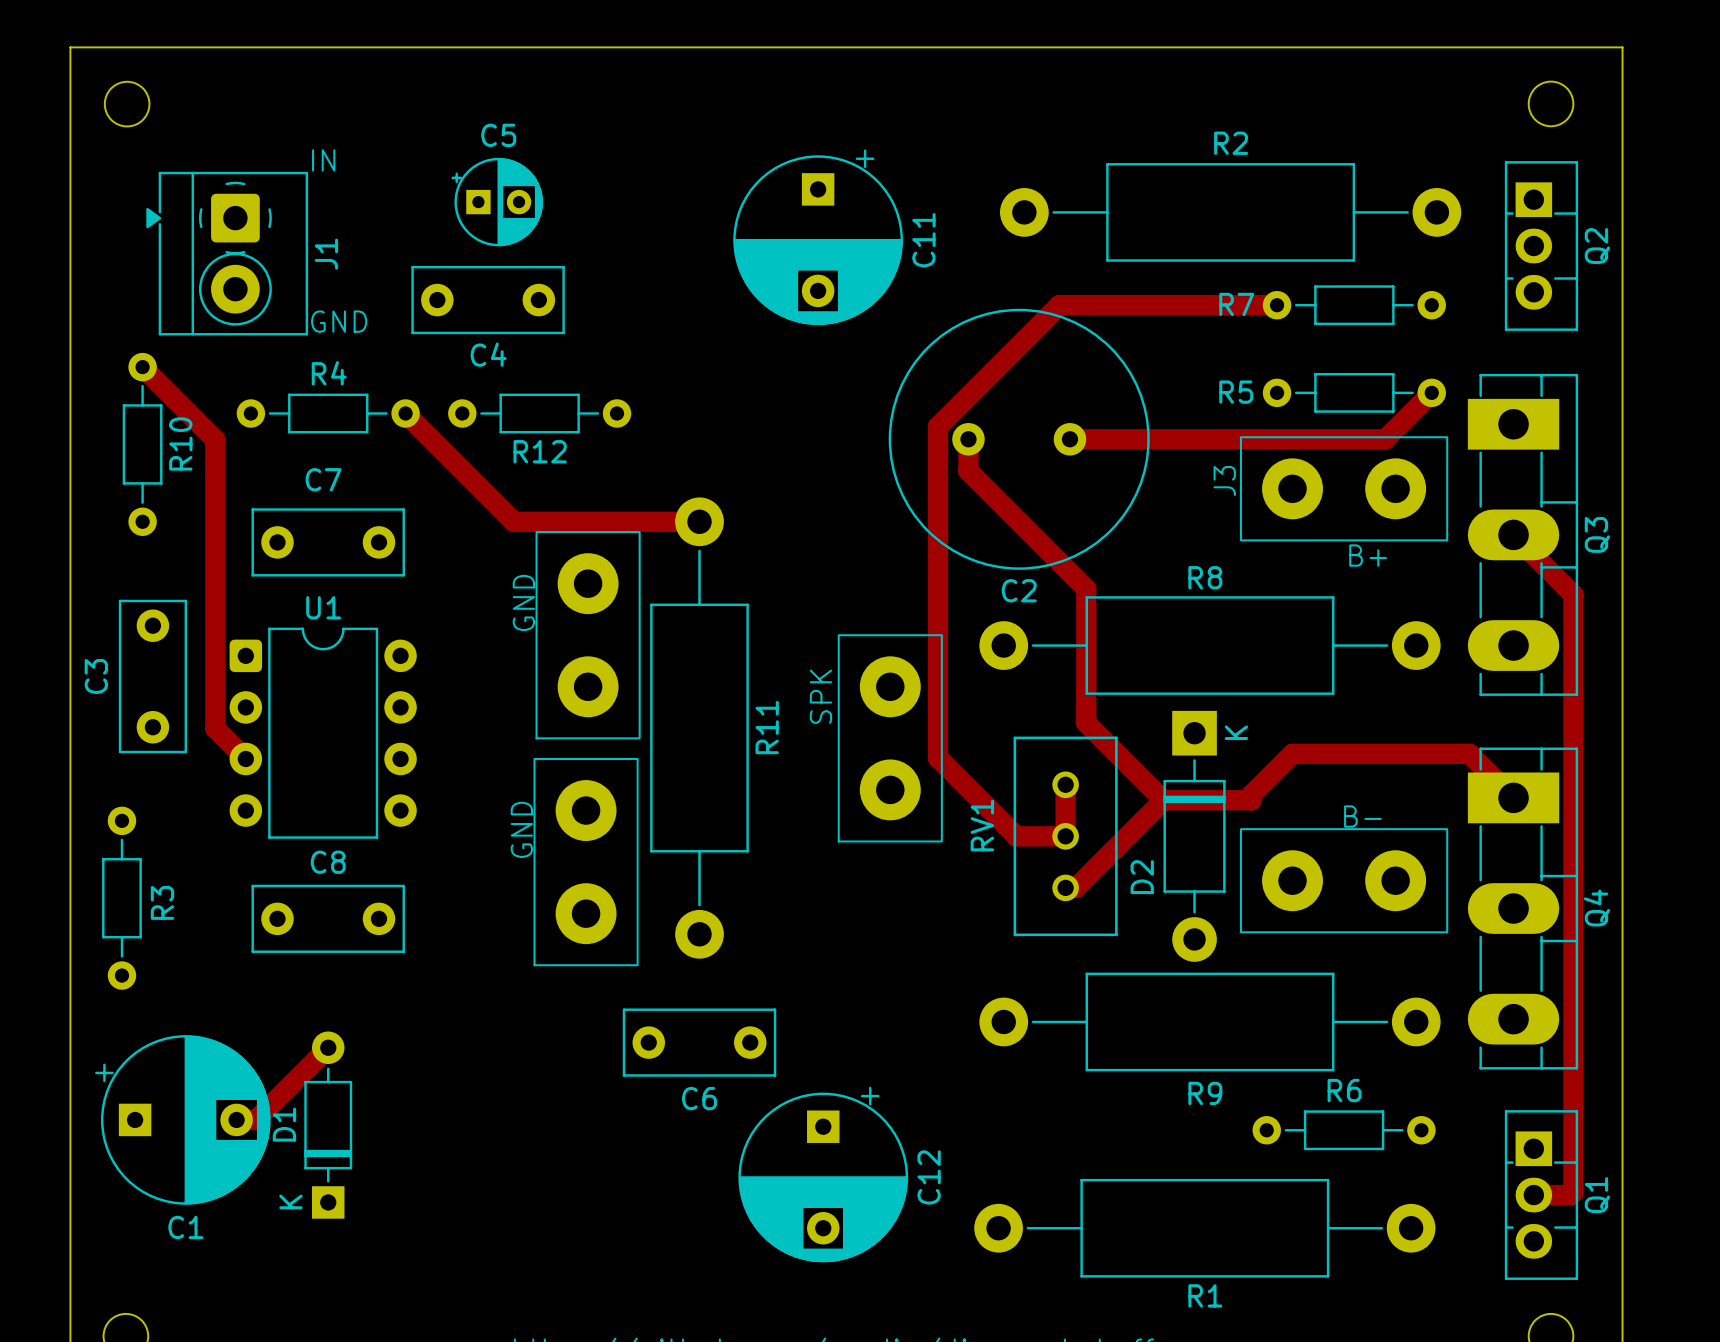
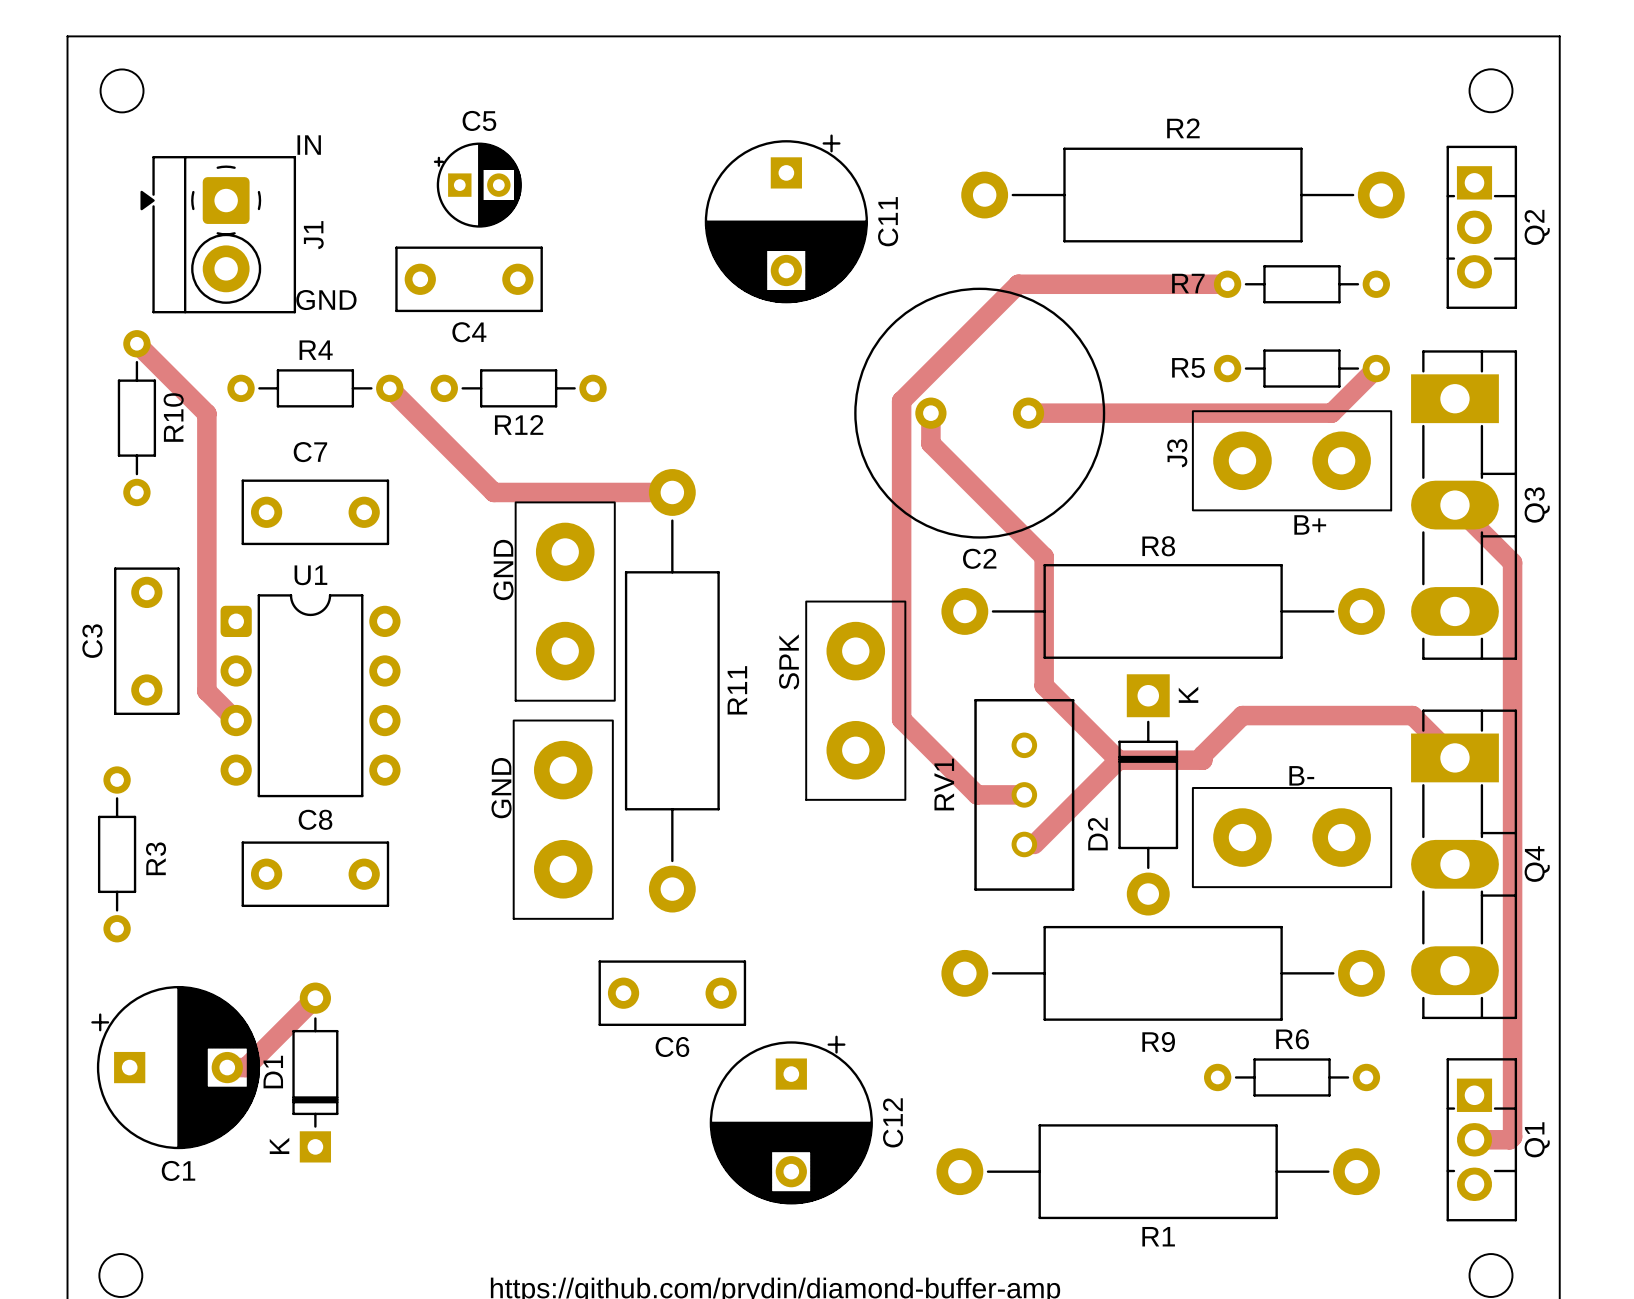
track: (1065, 784) (1065, 836) -> none

